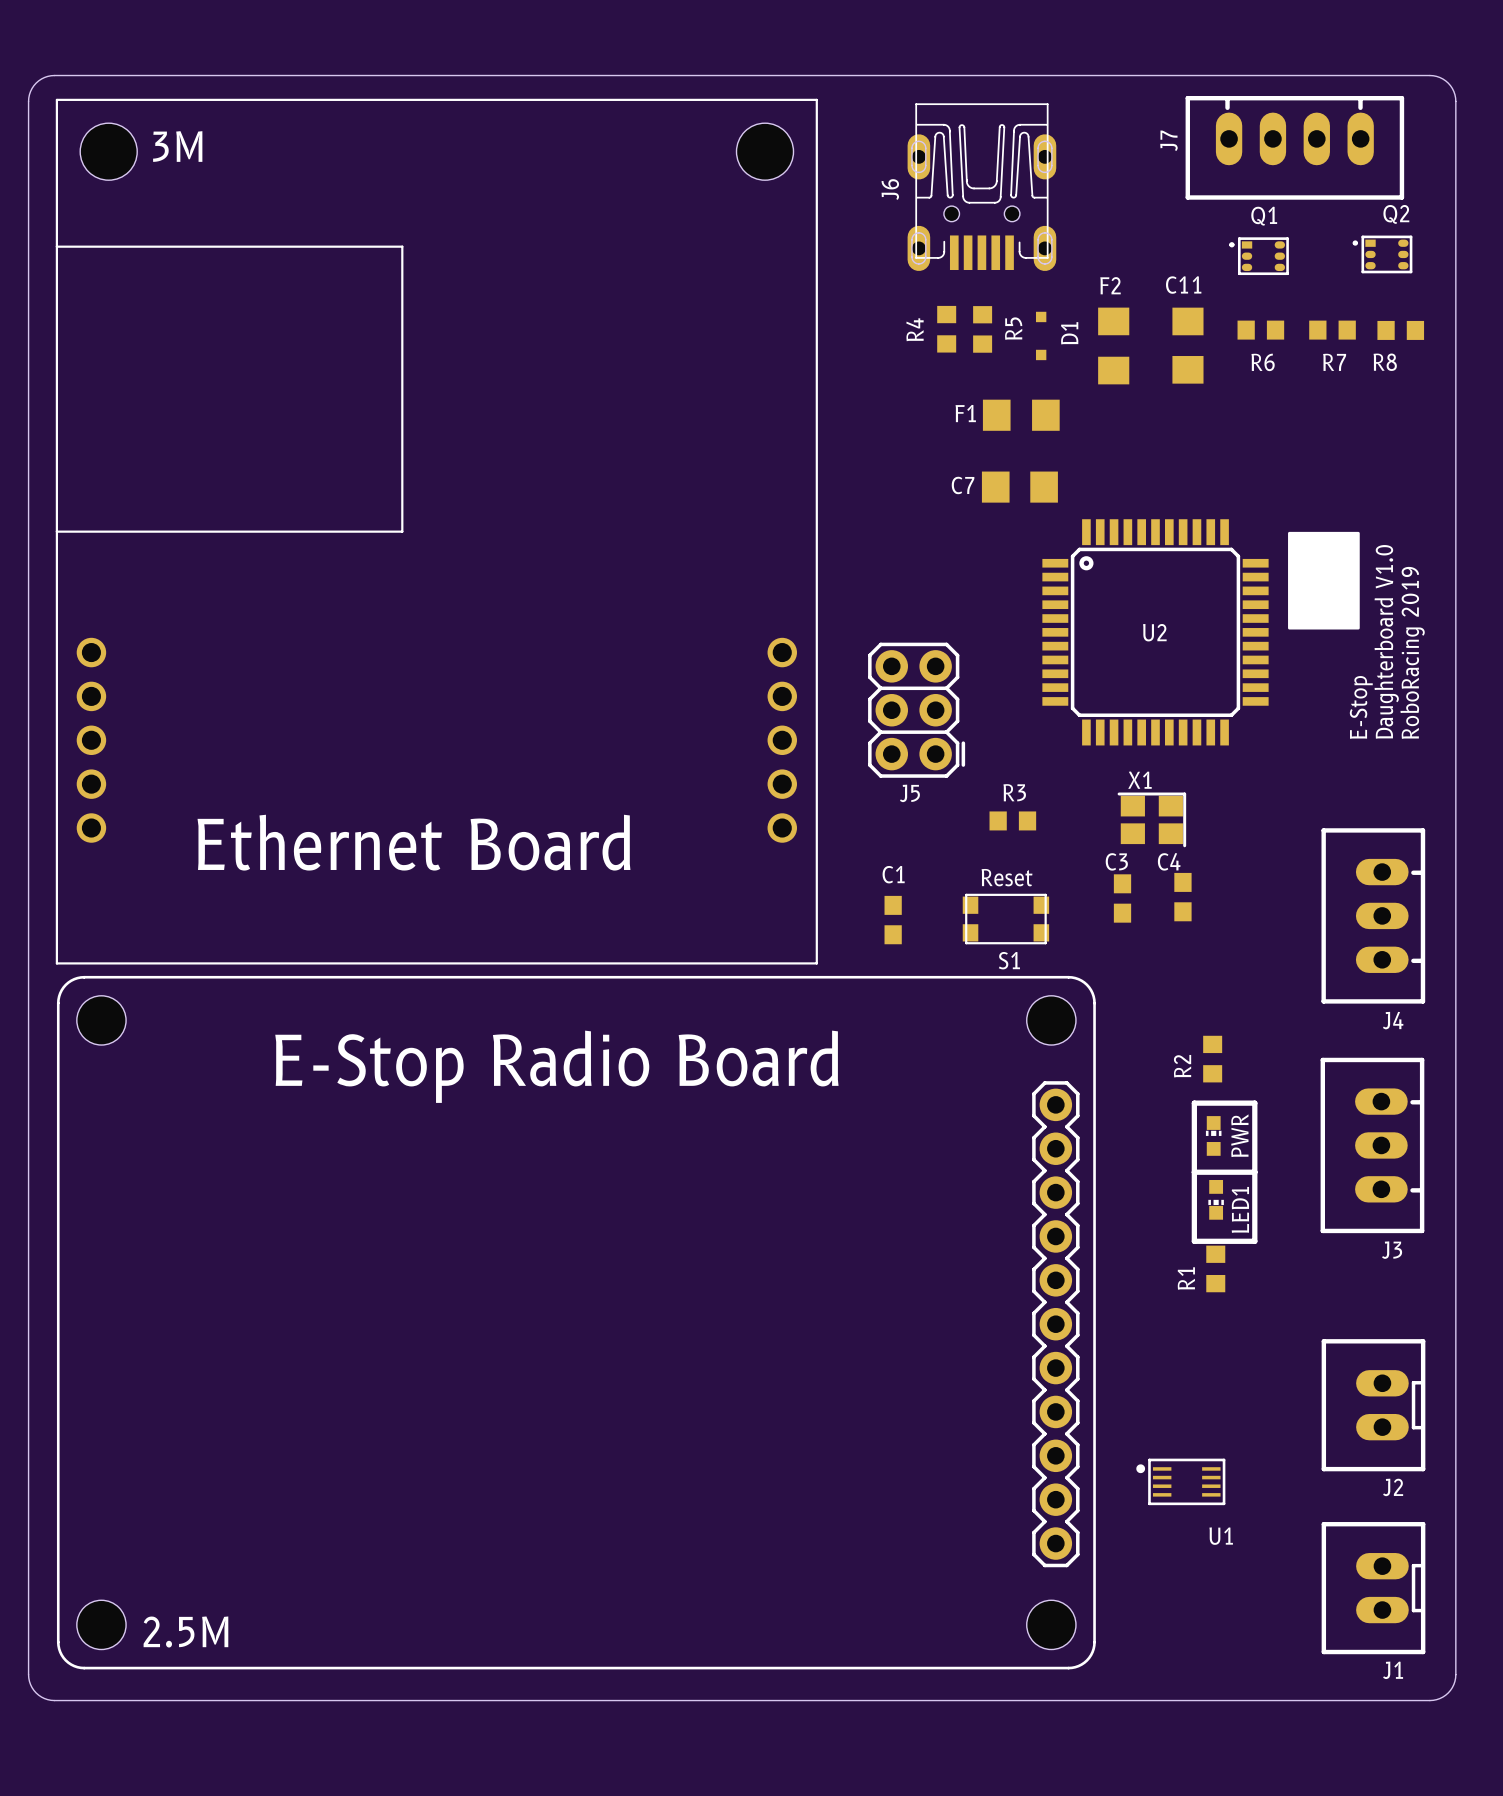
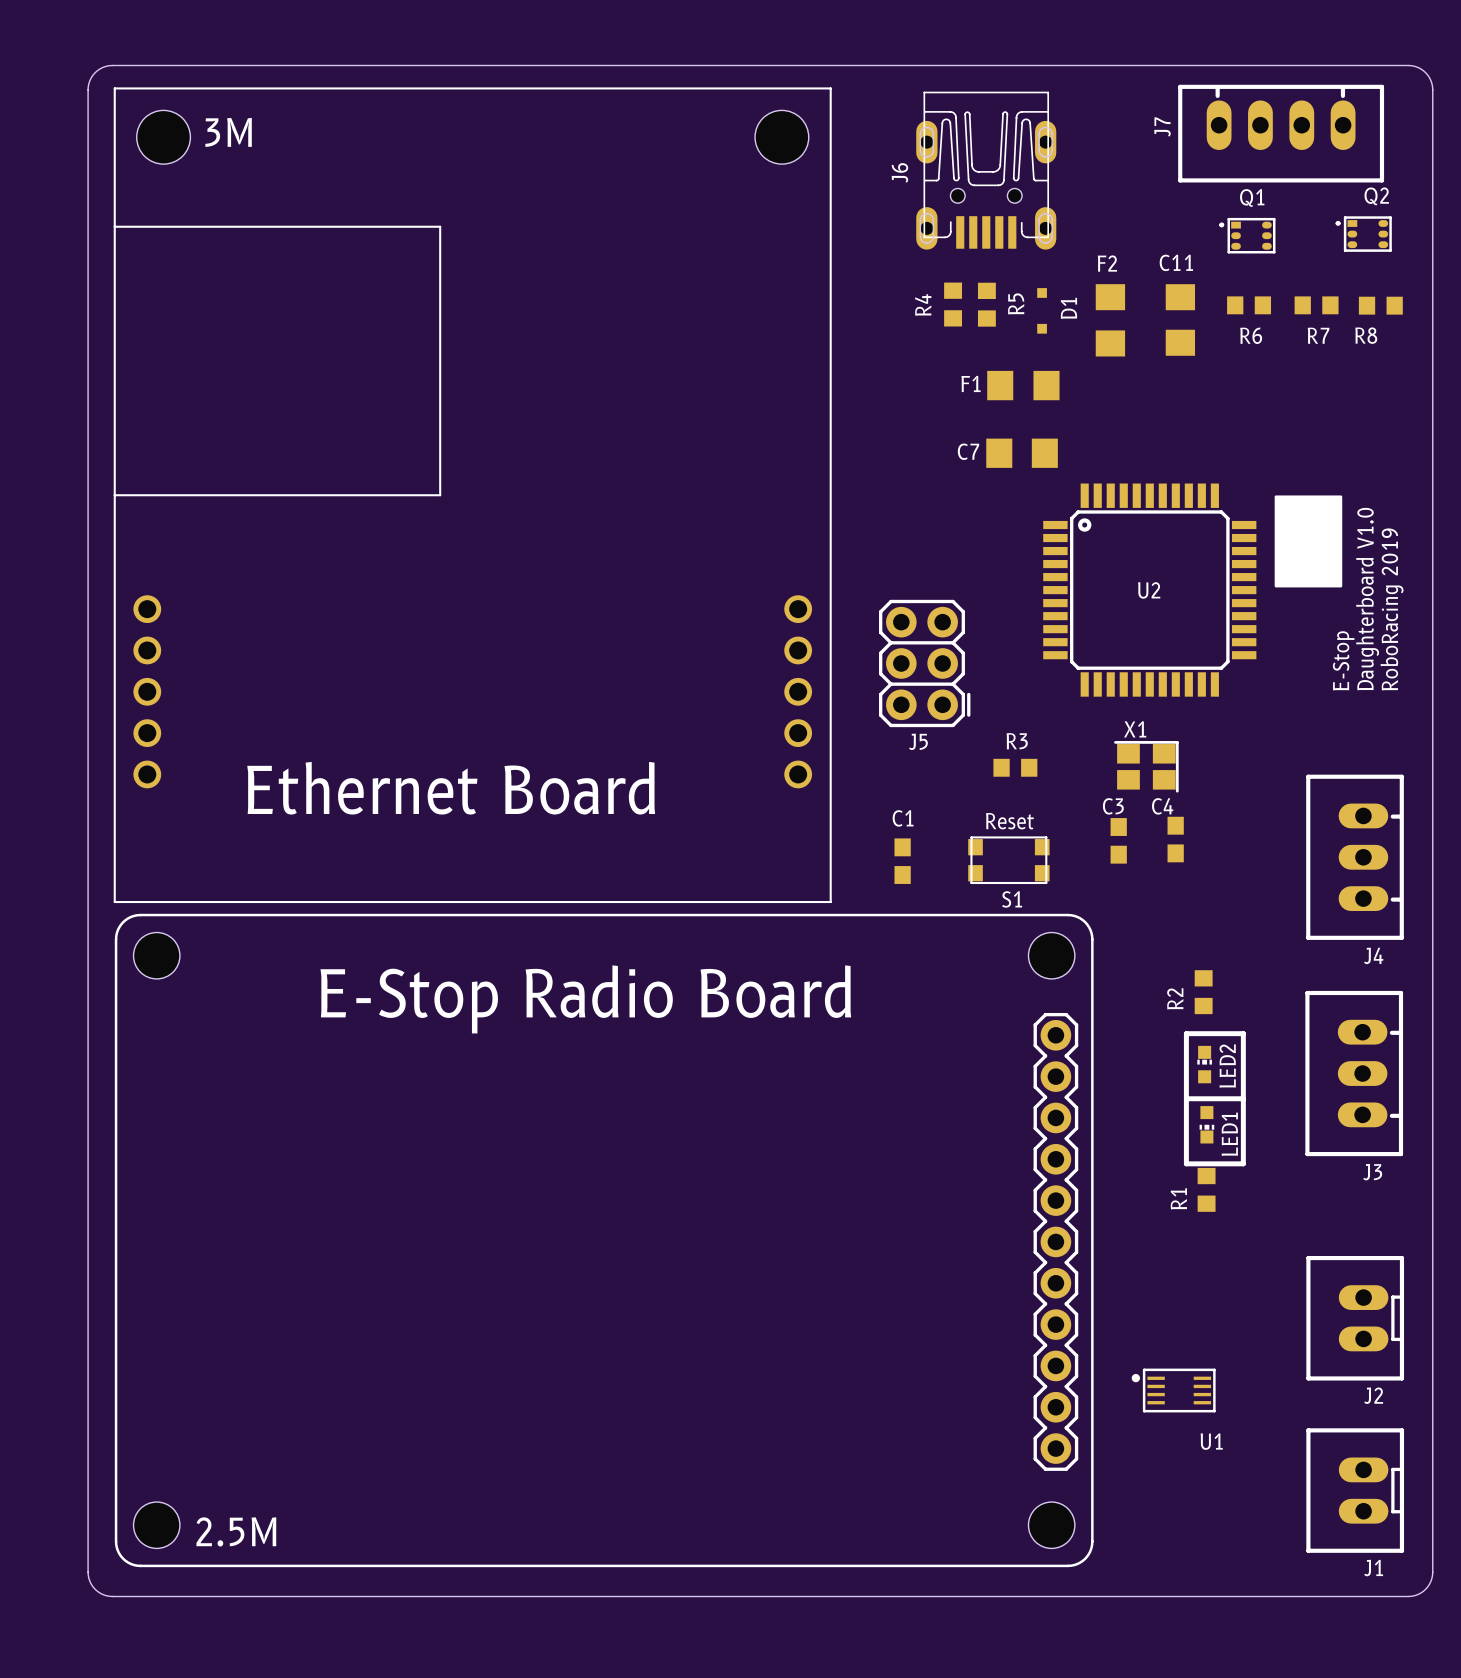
PWR name: PWR (1239, 1135) -> LED2 (1227, 1066)

